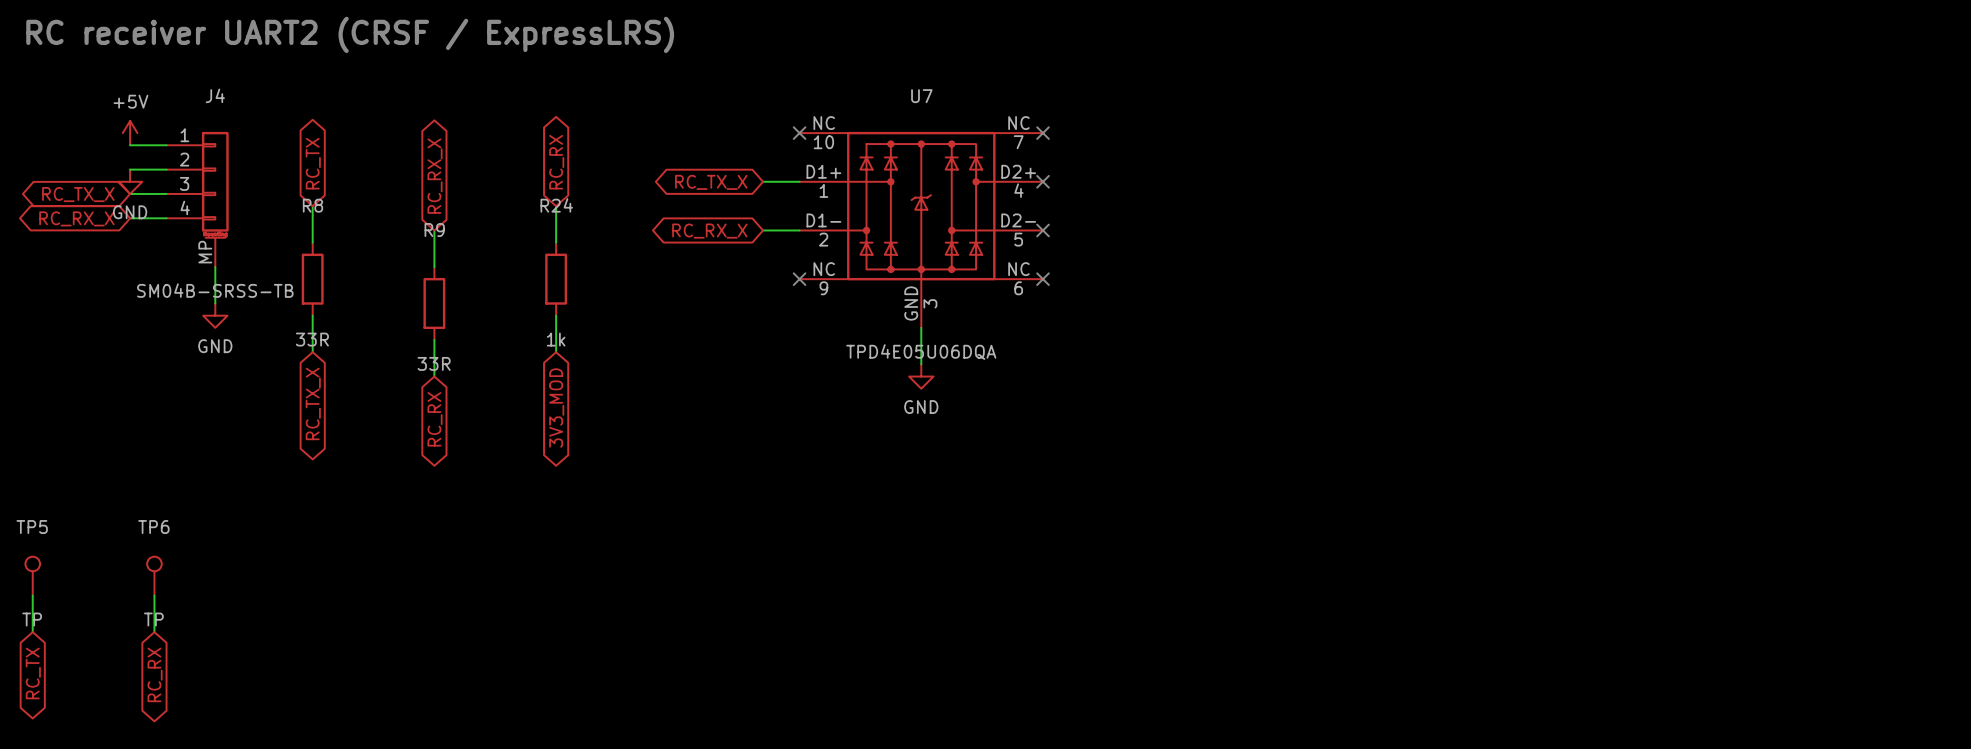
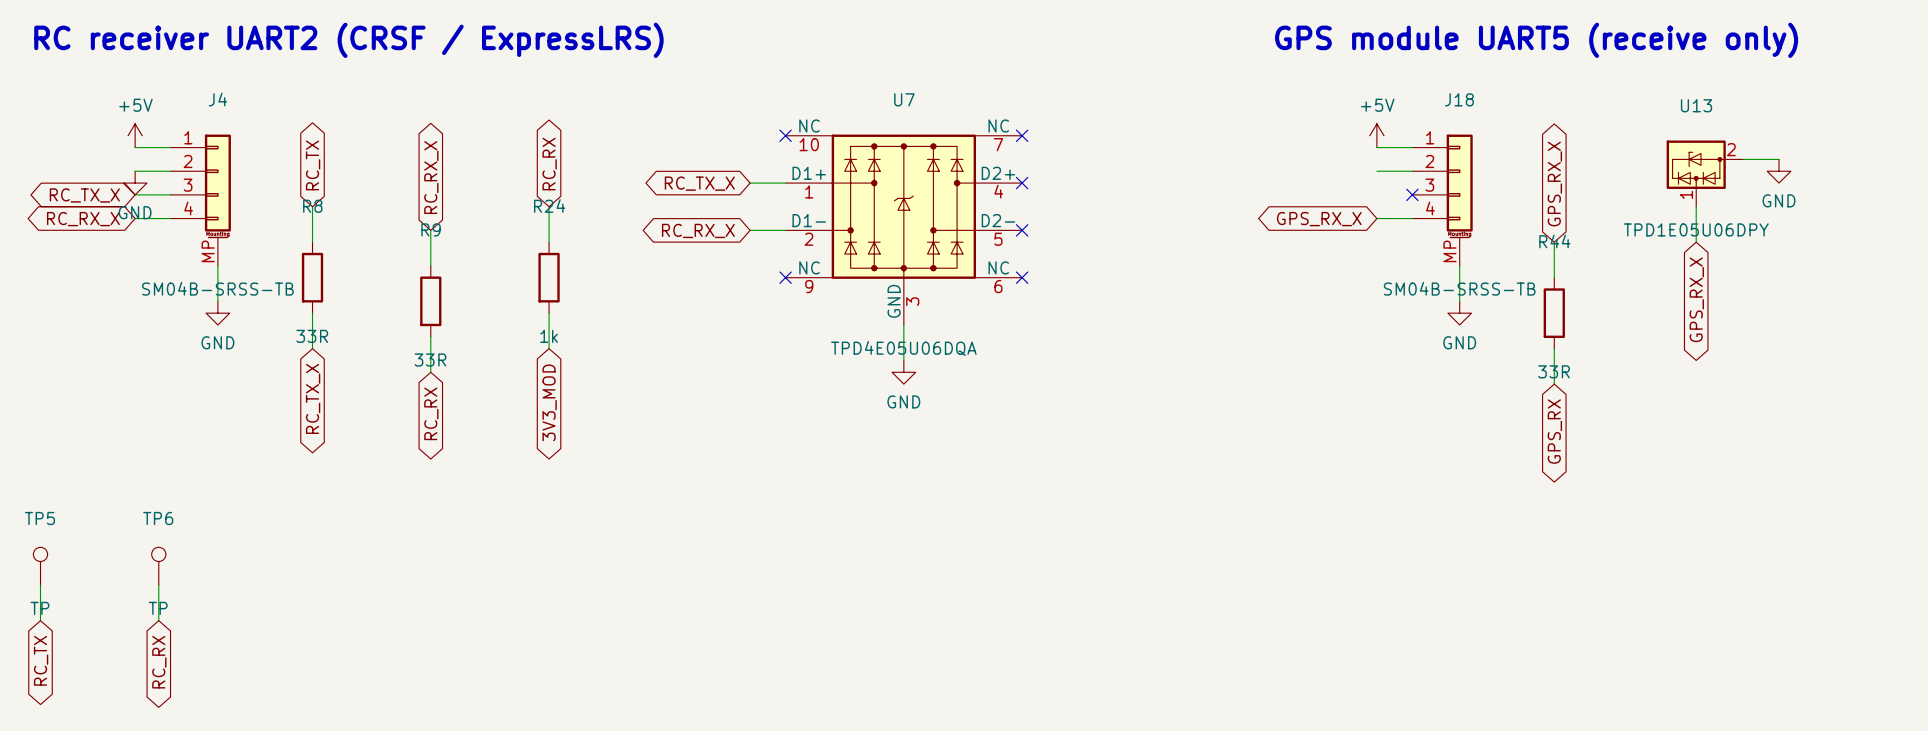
text: none -> GPS module UART5 (receive only) (1536, 40)
power symbol: none -> +5V (1376, 135)
wire: none -> (1376, 147) (1412, 147)
wire: none -> (1743, 159) (1779, 159)
wire: none -> (1376, 171) (1412, 171)
power symbol: none -> GND (1779, 171)
U13: none -> TPD1E05U06DPY (1705, 173)
global label: none -> GPS_RX_X (1554, 184)
no-connect mark: none -> (1412, 194)
J18: none -> SM04B-SRSS-TB (1442, 200)
wire: none -> (1696, 206) (1696, 242)
global label: none -> GPS_RX_X (1319, 219)
wire: none -> (1376, 218) (1412, 218)
wire: none -> (1554, 242) (1554, 277)
wire: none -> (1459, 265) (1459, 301)
global label: none -> GPS_RX_X (1696, 299)
power symbol: none -> GND (1459, 313)
R44: none -> 33R (1554, 313)
wire: none -> (1554, 348) (1554, 384)
global label: none -> GPS_RX (1554, 431)

